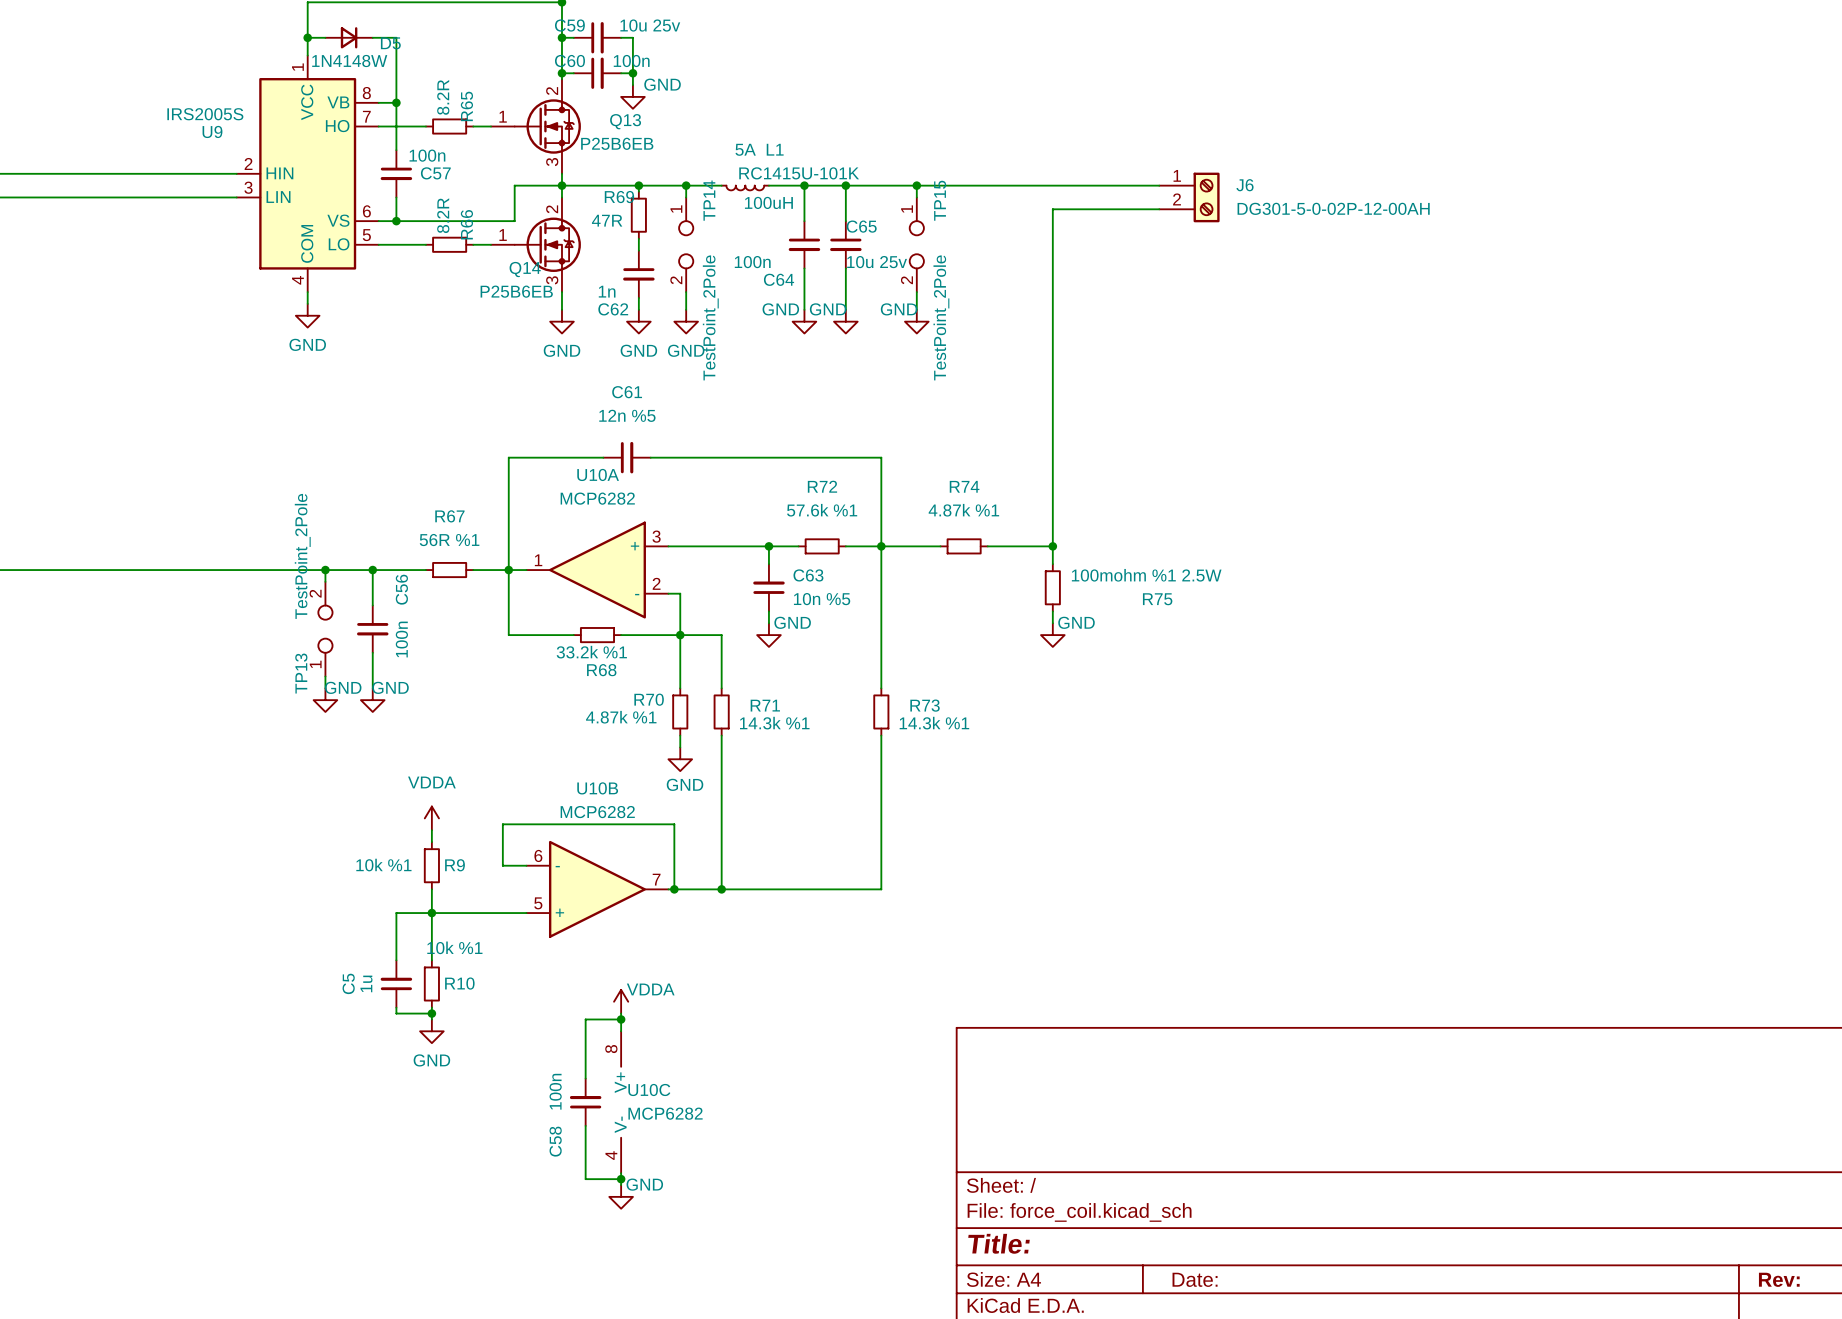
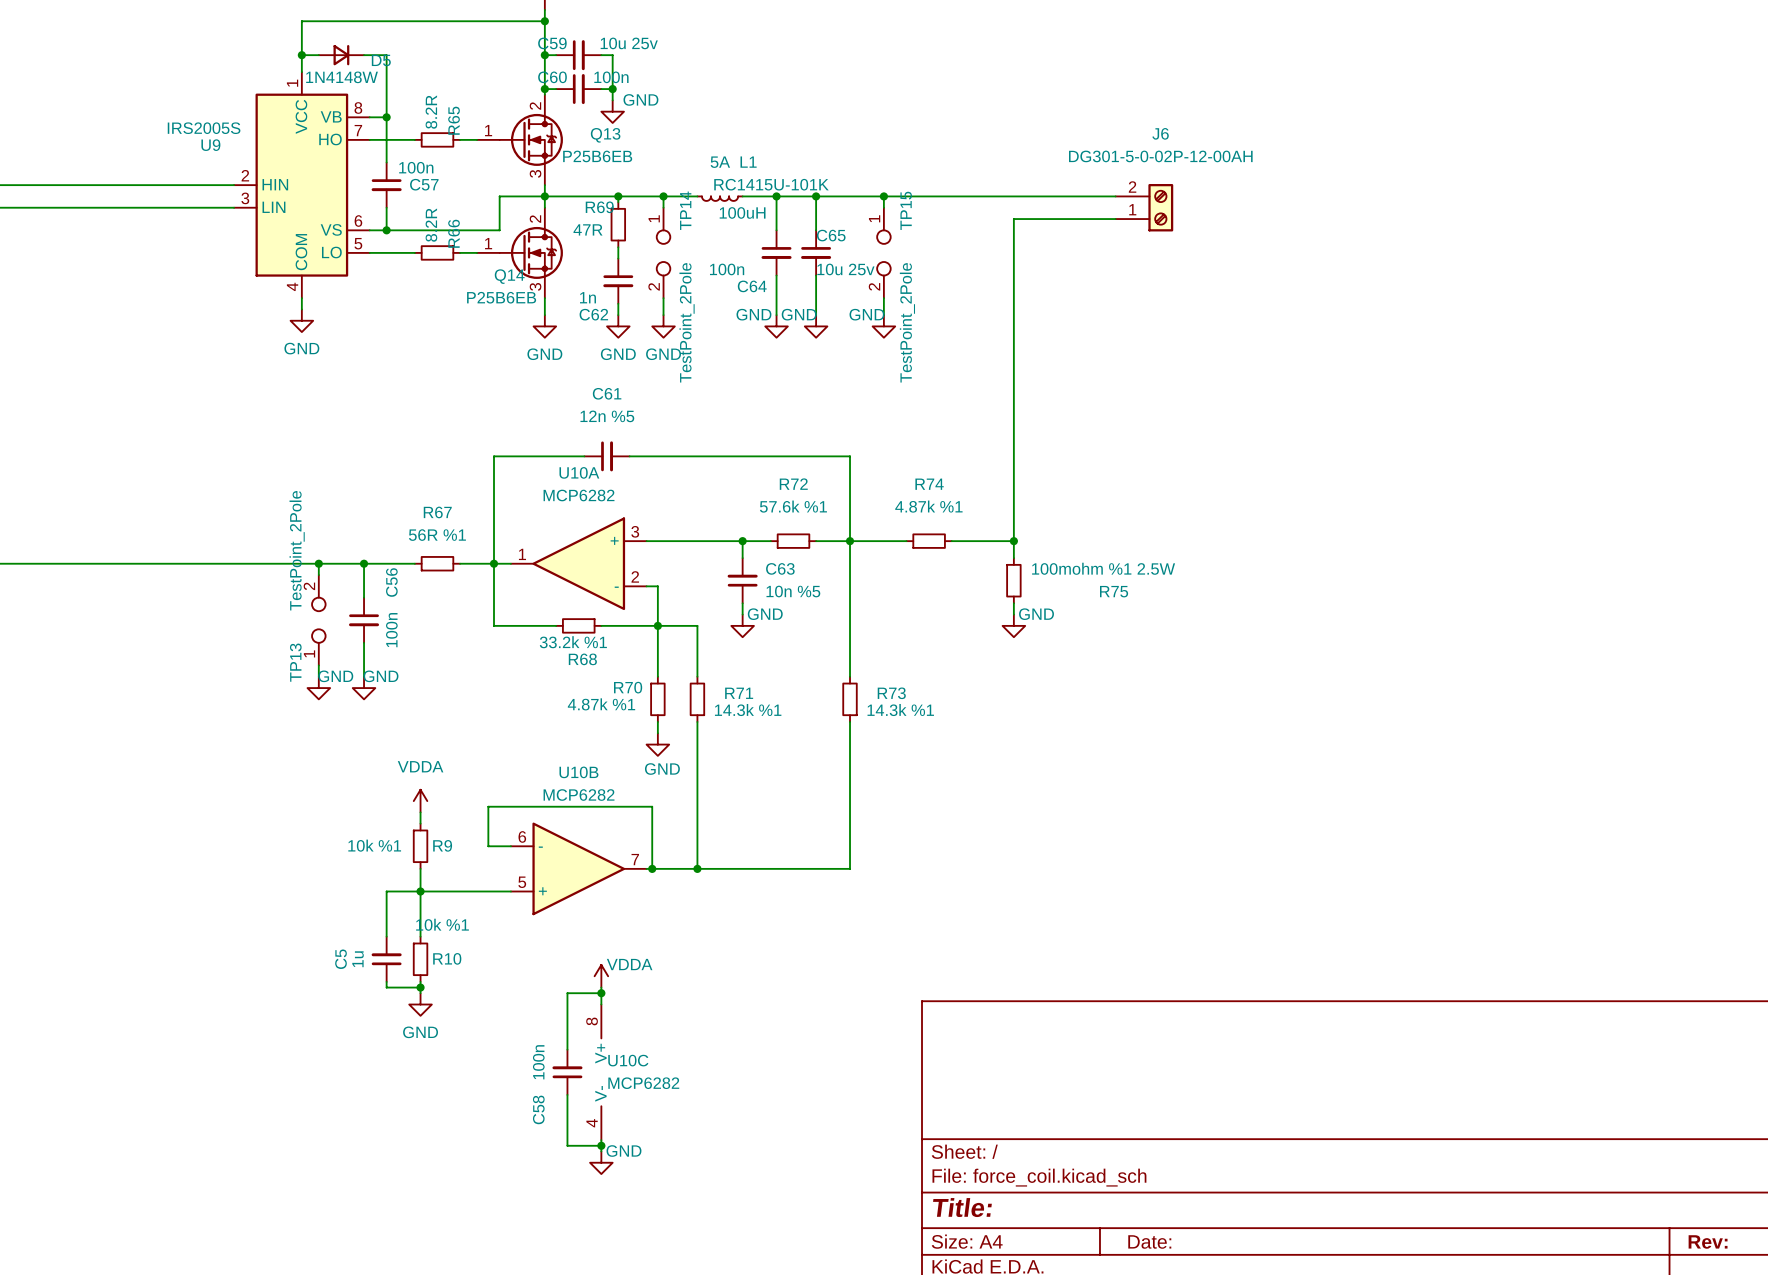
J6 name position: J6 (1244, 185) -> J6 (1160, 133)
J6 flip: as is (1206, 197) -> up-down (1160, 207)
J6 value position: DG301-5-0-02P-12-00AH (1333, 208) -> DG301-5-0-02P-12-00AH (1160, 156)

